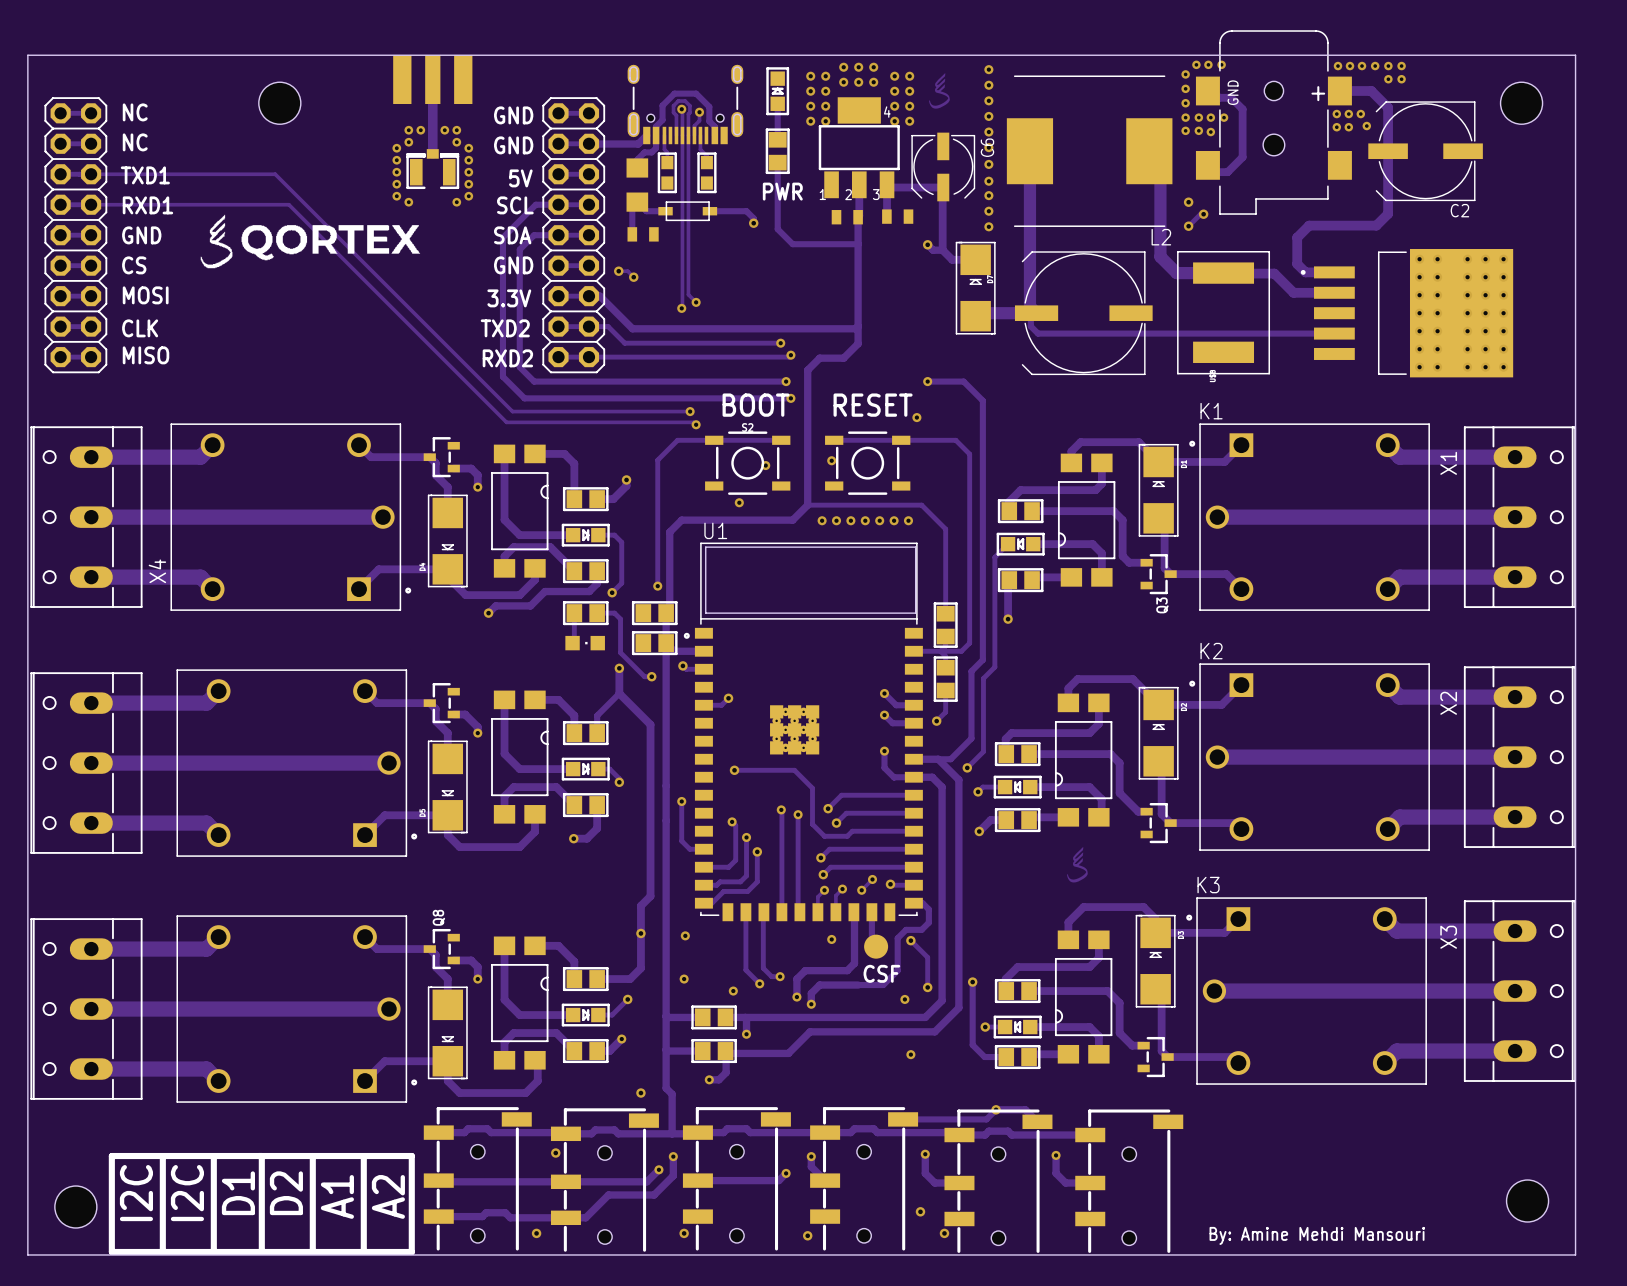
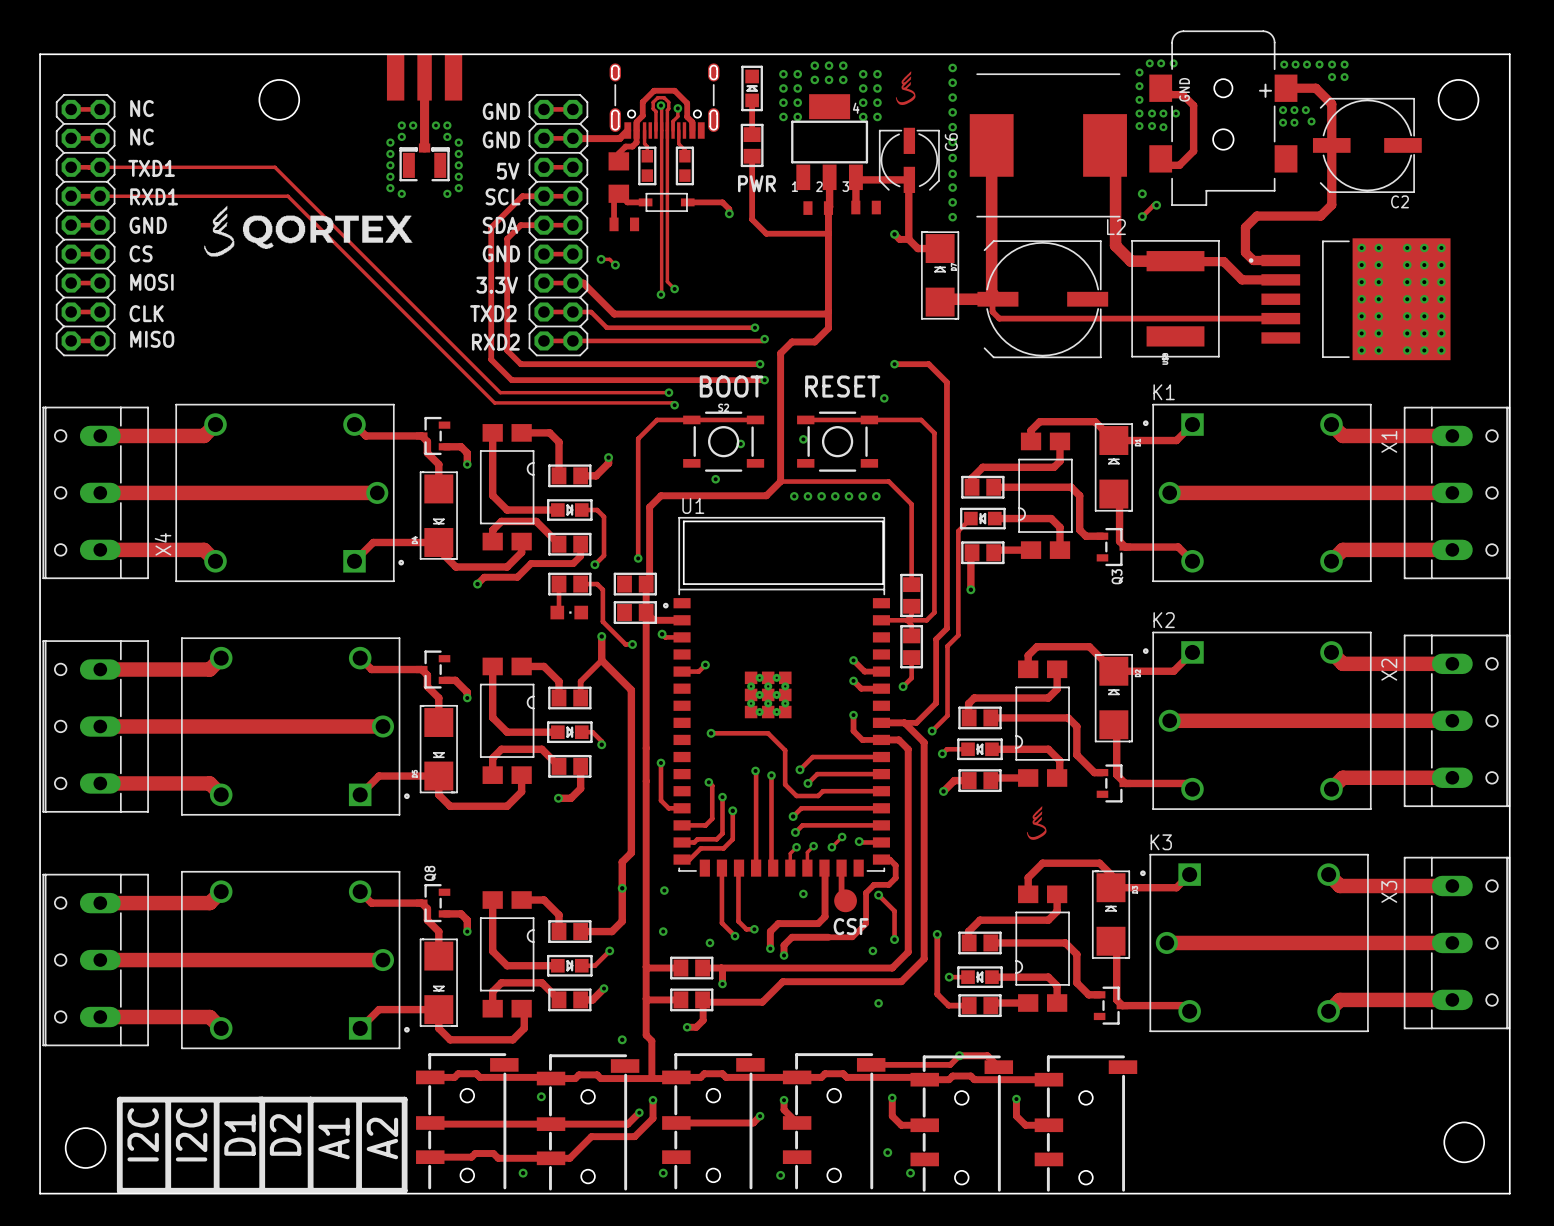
text: By: Amine Mehdi Mansouri (1317, 1235) -> none

